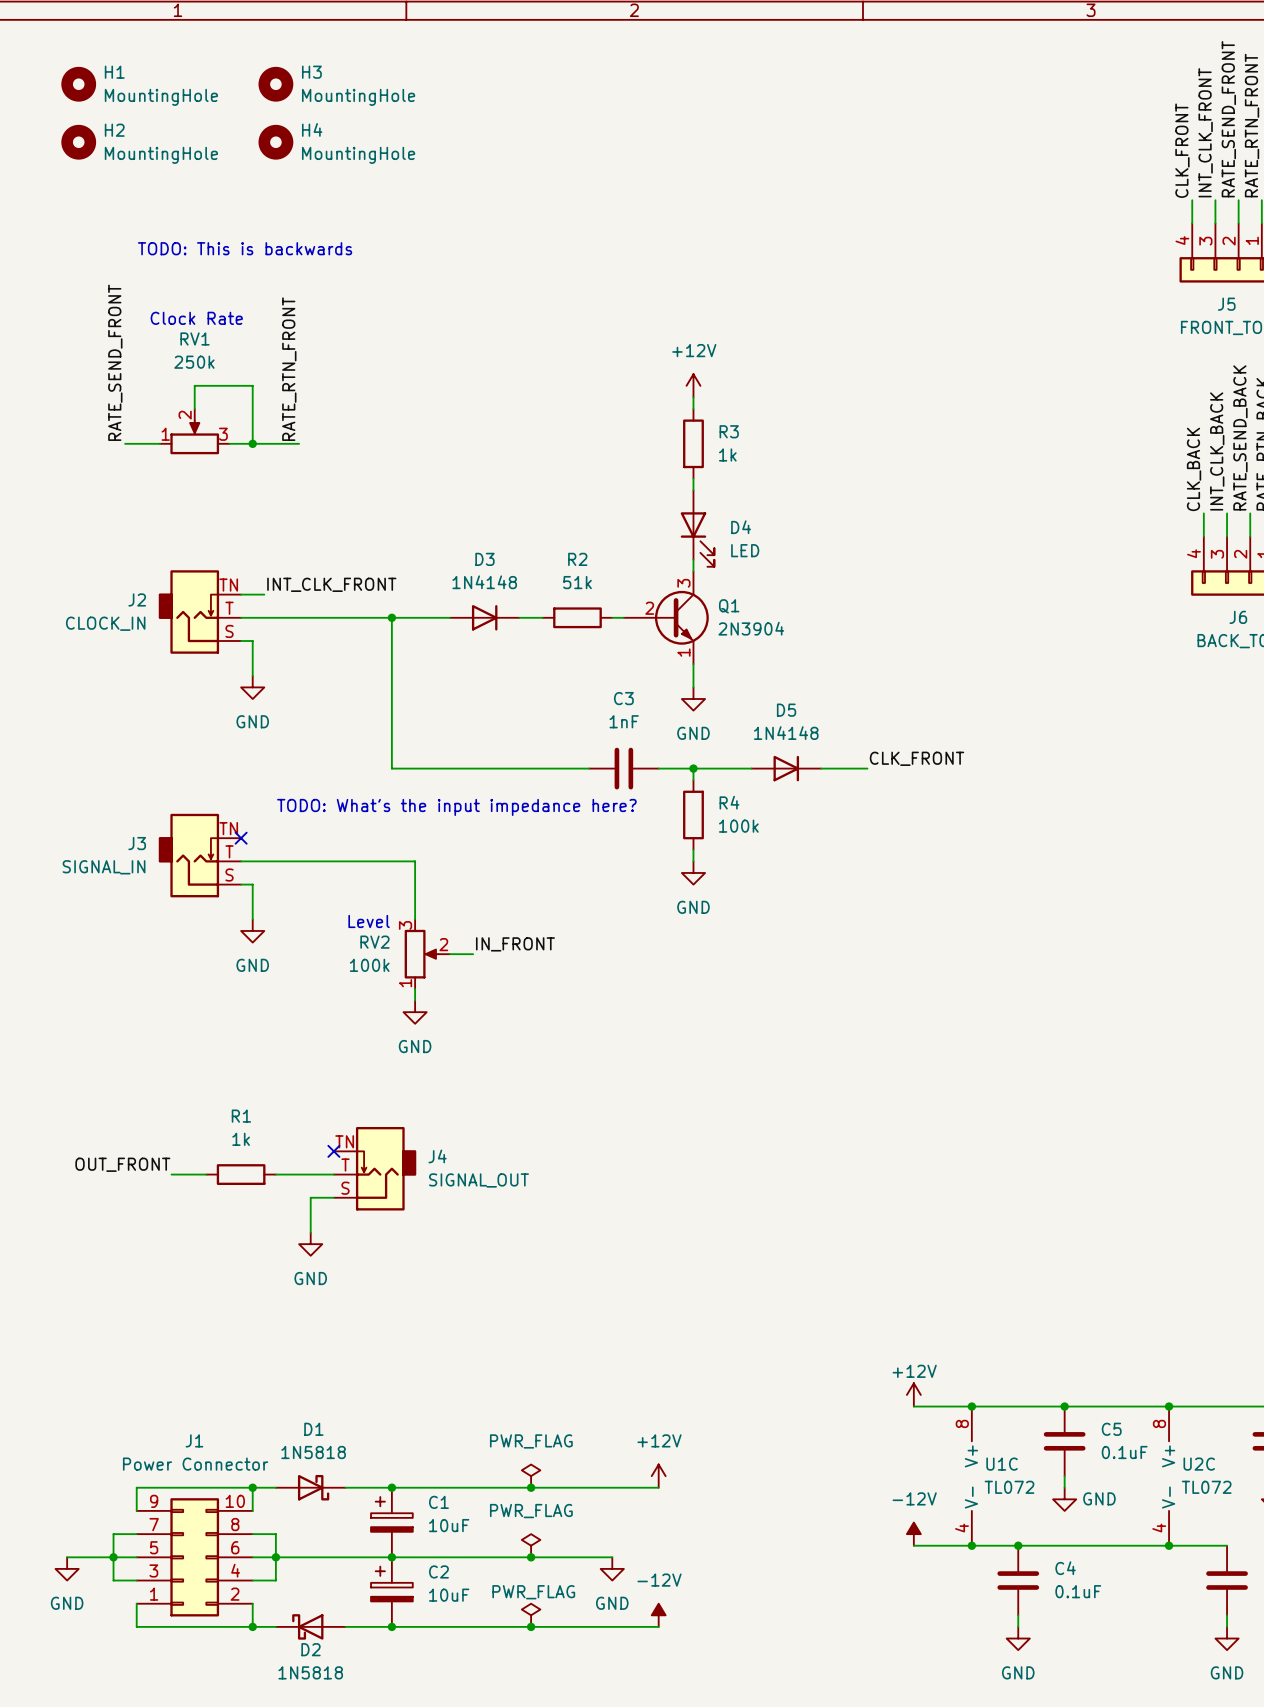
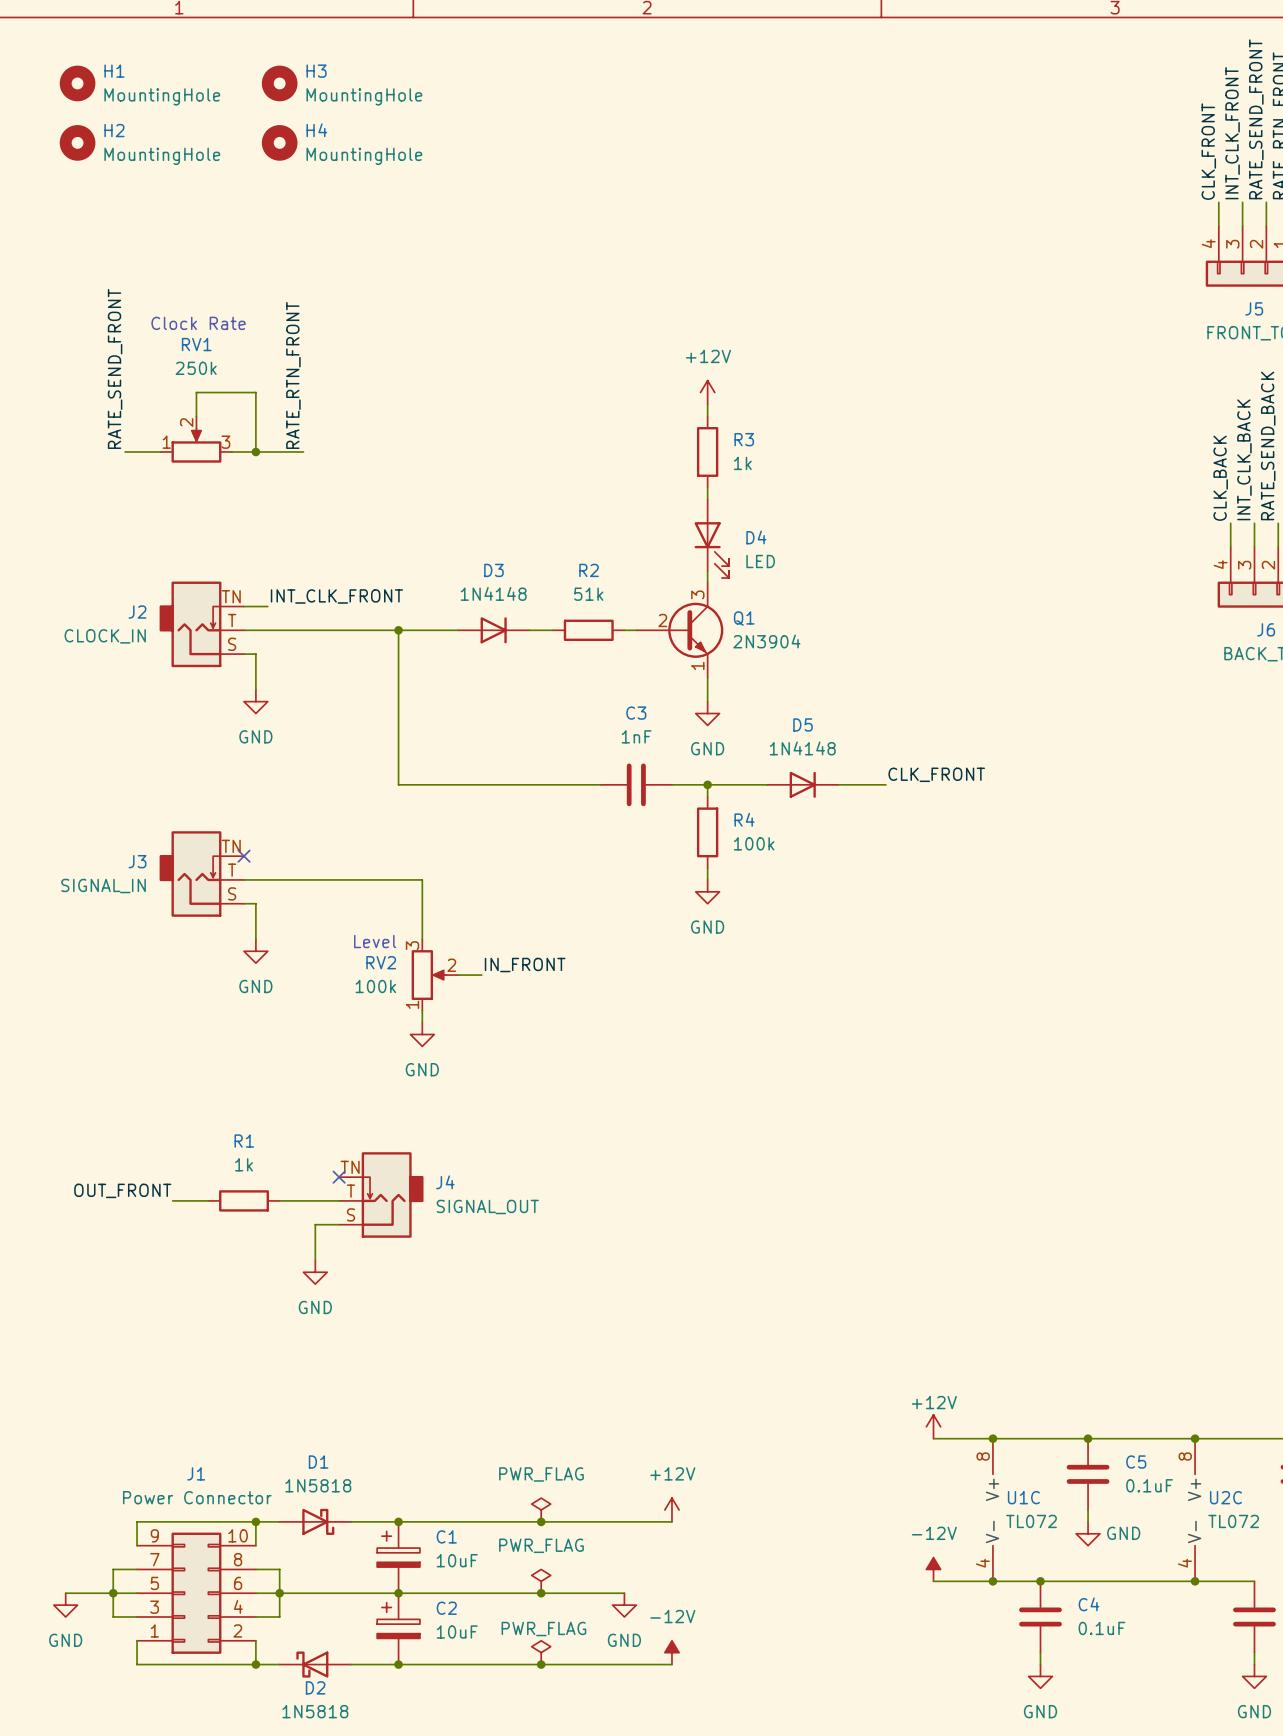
text: TODO: This is backwards (245, 248) -> none
text: TODO: What's the input impedance here? (456, 807) -> none

